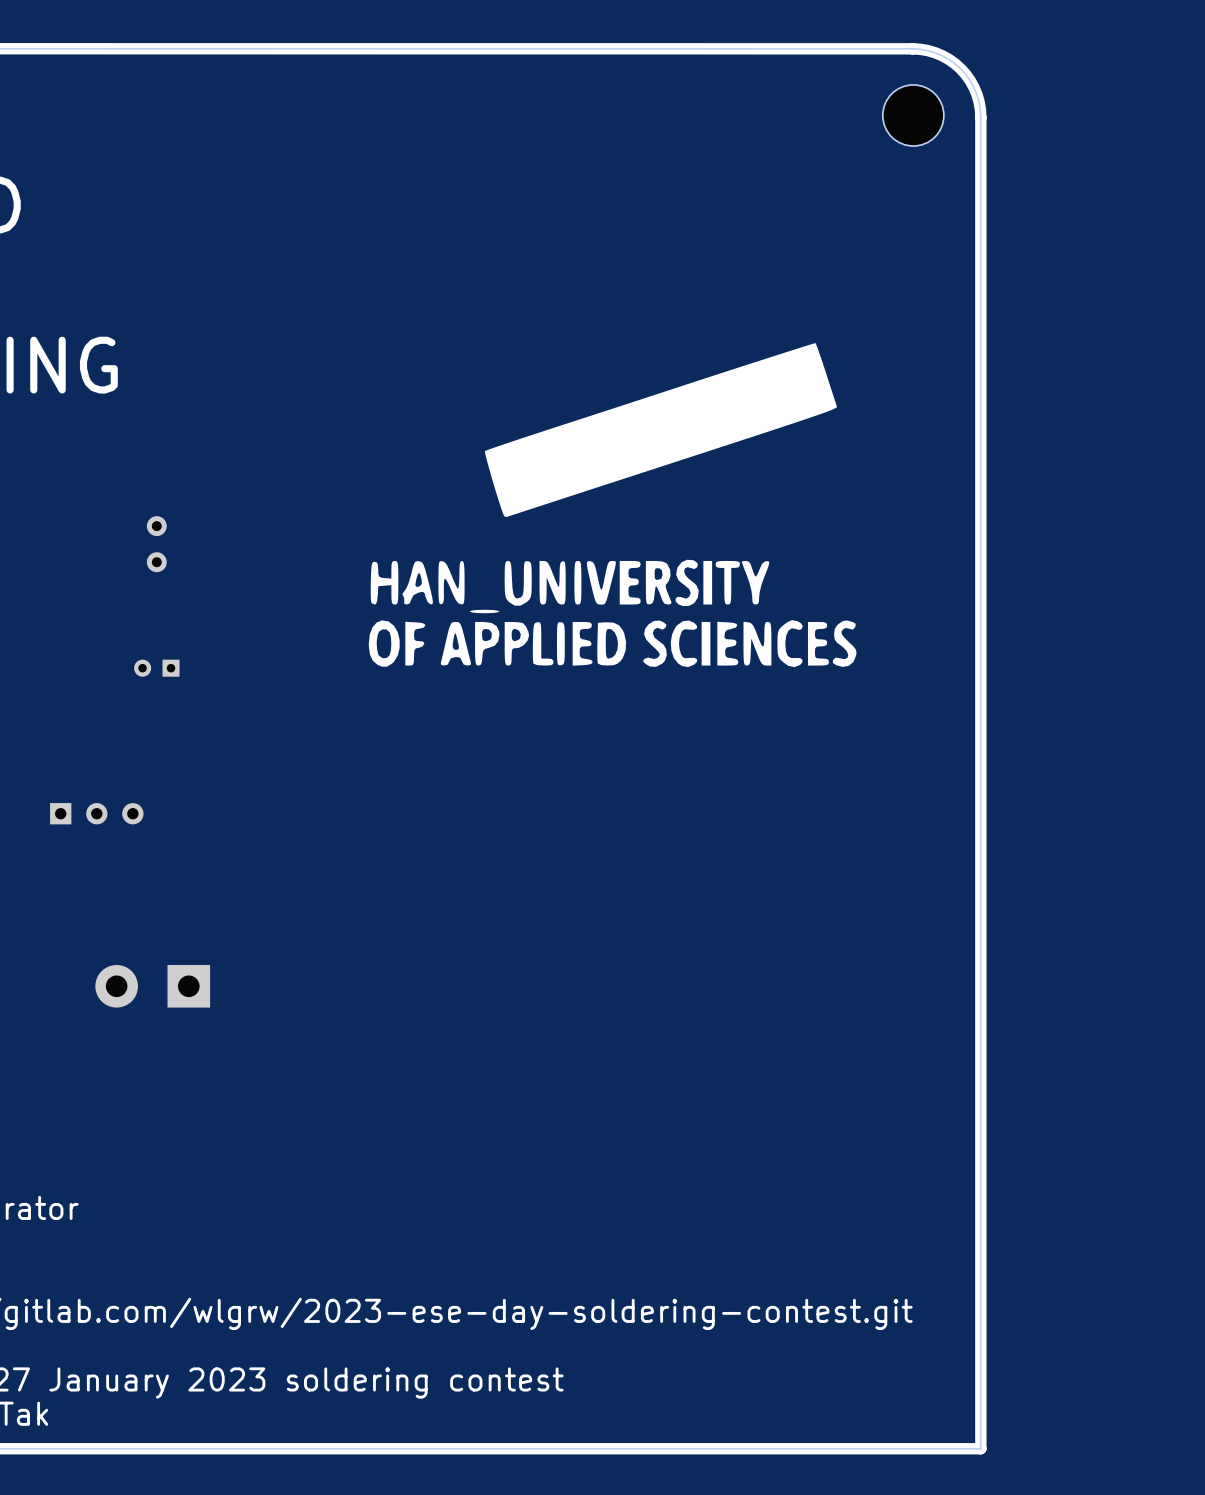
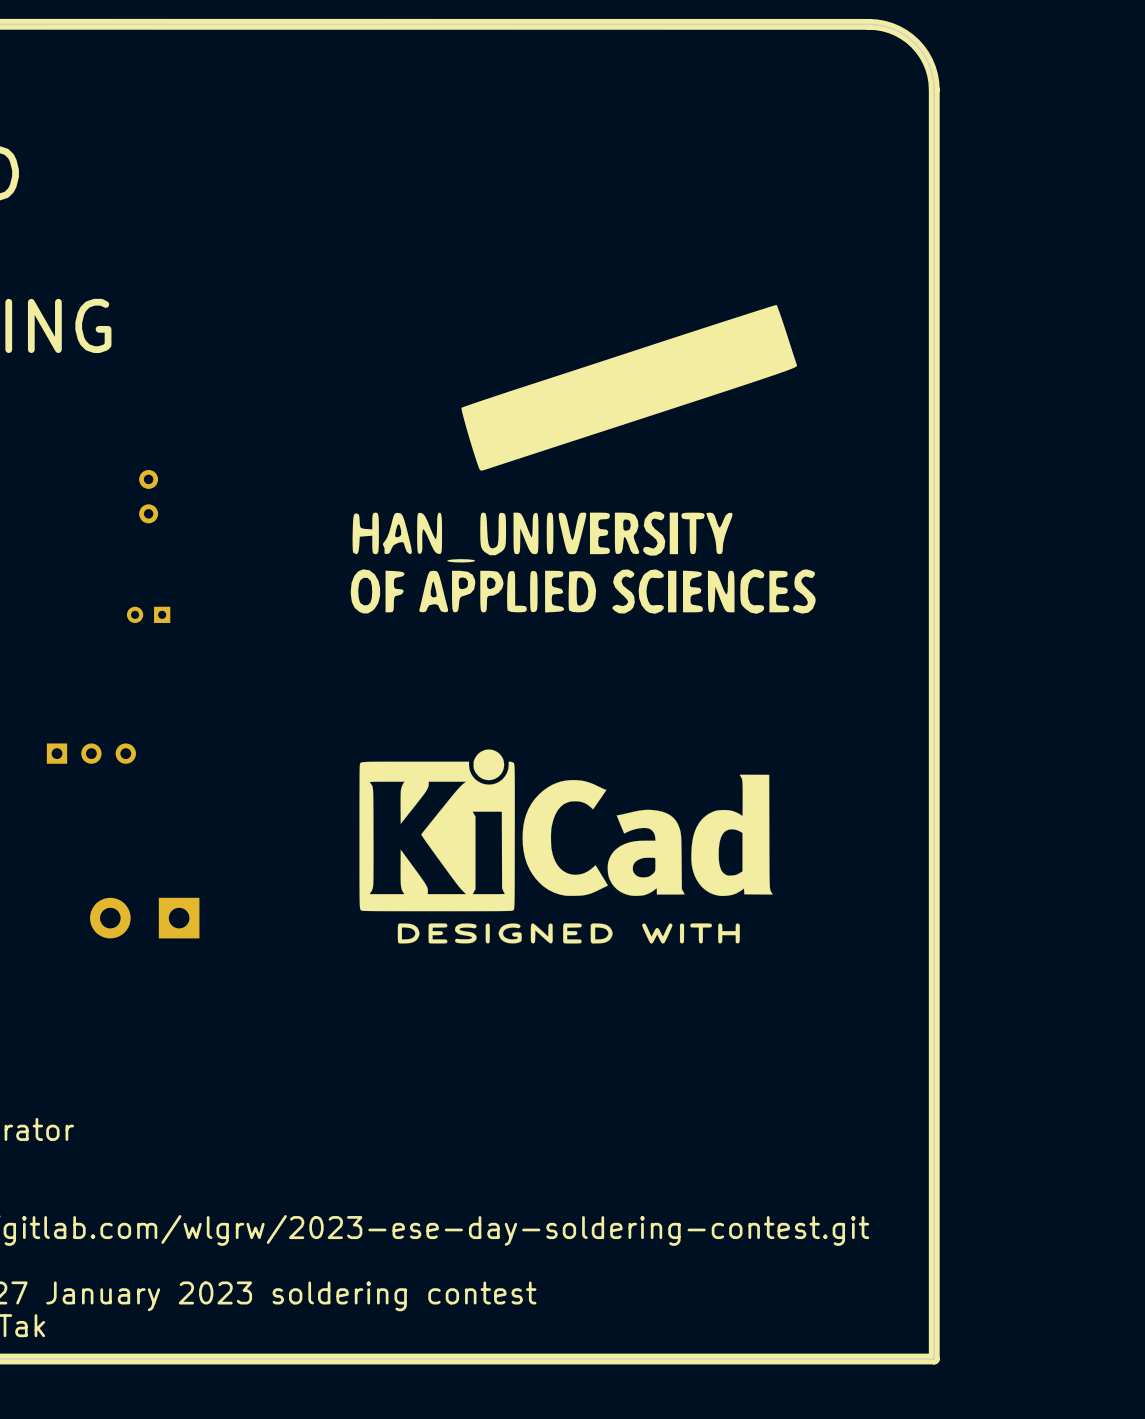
part: (913, 115) -> none
drawing: none -> [359, 749, 773, 944]

